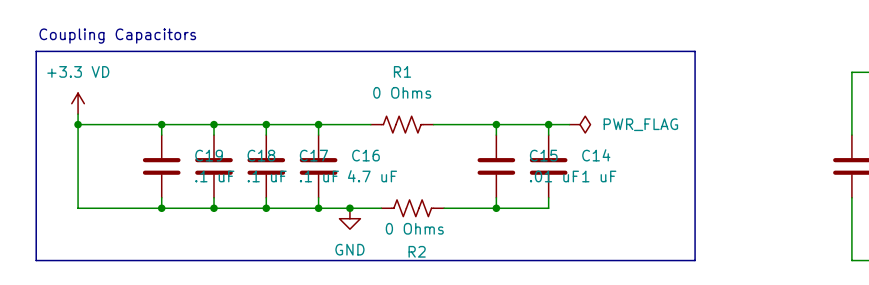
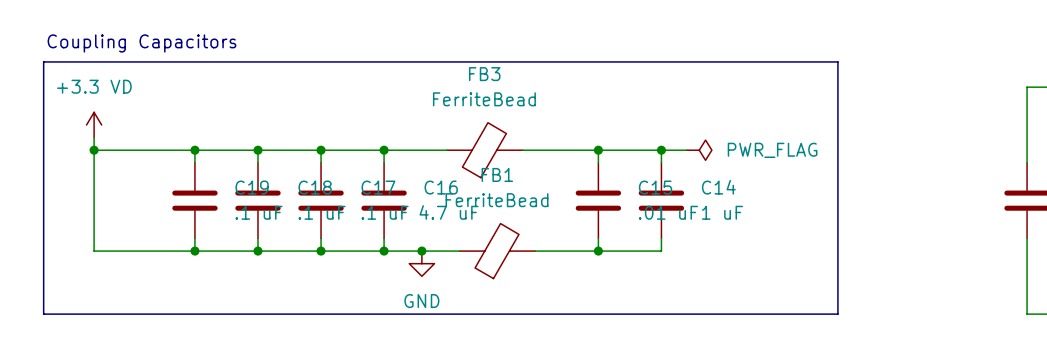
R1: 0 Ohms (402, 124) -> none
FB3: none -> FerriteBead (484, 150)
R2: 0 Ohms (412, 208) -> none
FB1: none -> FerriteBead (497, 251)

